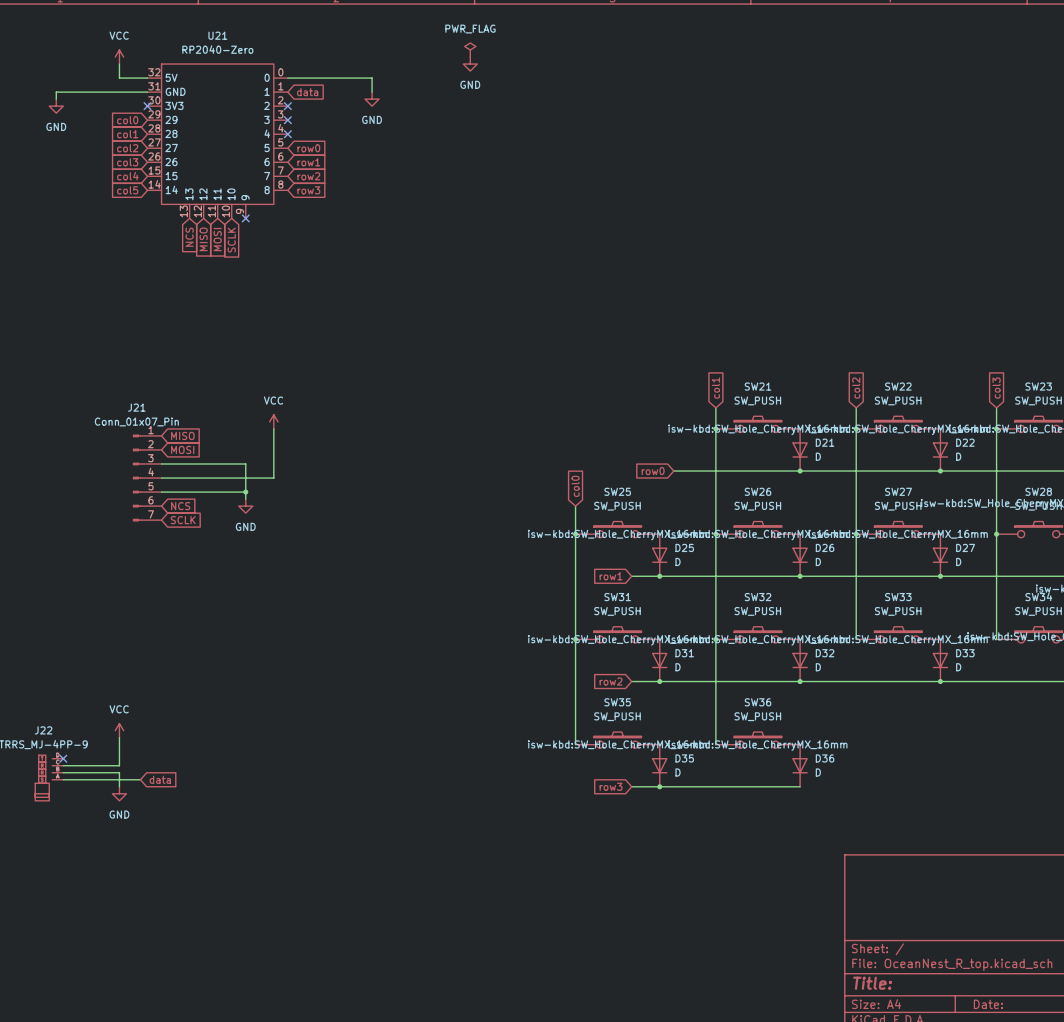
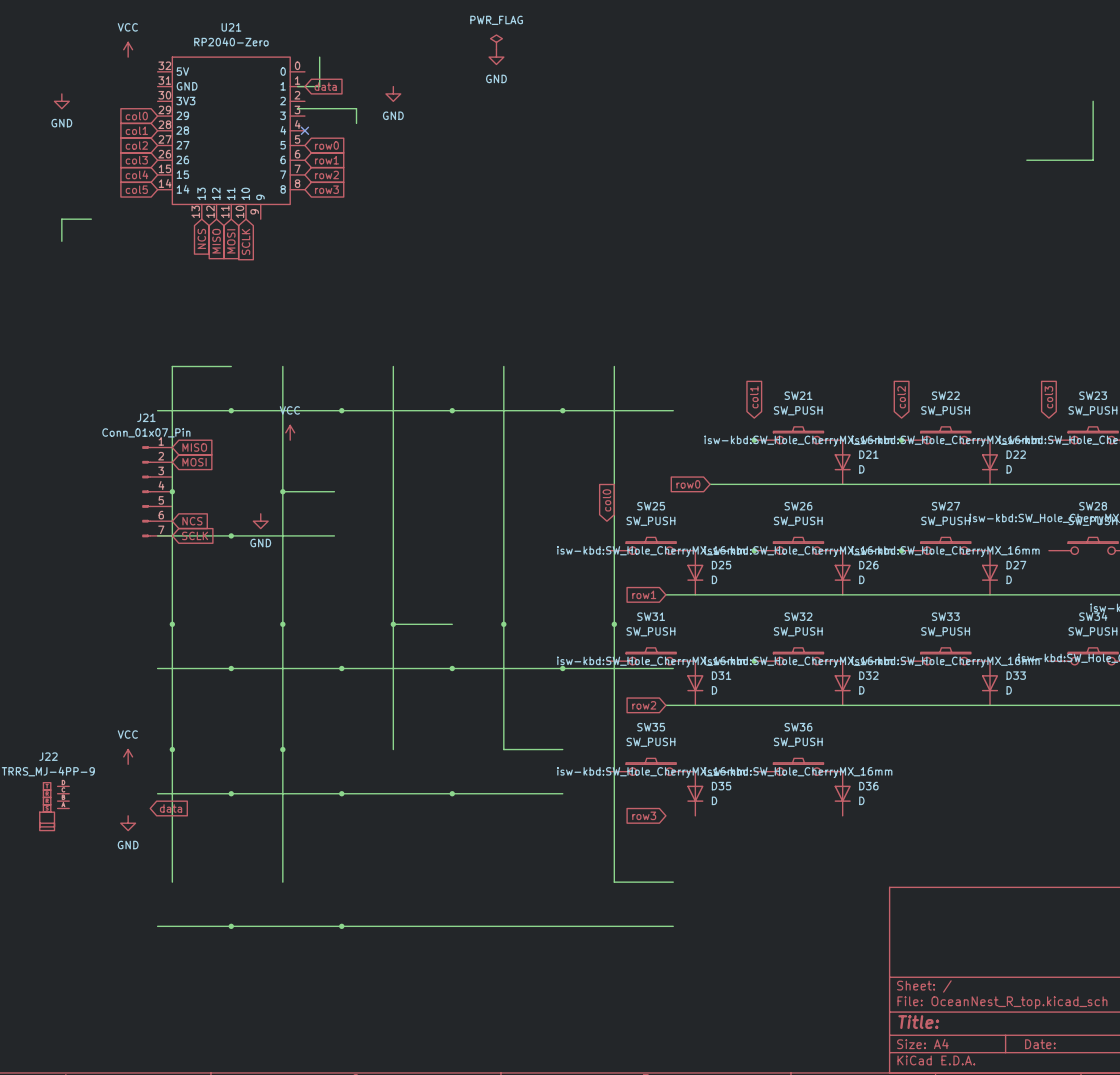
wire: (119, 64) (119, 78) (147, 78) -> none
wire: none -> (319, 57) (319, 86) (297, 86)
wire: (287, 78) (372, 78) (372, 92) -> none
wire: (147, 92) (56, 92) (56, 99) -> none
no-connect mark: (147, 106) -> none
no-connect mark: (287, 106) -> none
wire: none -> (1093, 101) (1093, 160) (1026, 160)
wire: none -> (297, 108) (356, 108) (356, 123)
no-connect mark: (287, 120) -> none
wire: none -> (91, 219) (61, 219) (61, 241)
no-connect mark: (245, 218) -> none
wire: none -> (231, 366) (172, 366) (172, 882)
wire: none -> (282, 366) (282, 882)
wire: none -> (393, 366) (393, 749)
wire: none -> (503, 366) (503, 749) (562, 749)
wire: none -> (614, 366) (614, 882) (673, 882)
wire: none -> (157, 410) (673, 410)
junction: none -> (231, 410)
junction: none -> (341, 410)
junction: none -> (452, 410)
junction: none -> (562, 410)
wire: (715, 407) (715, 744) -> none
wire: (856, 407) (856, 639) -> none
wire: (996, 407) (996, 639) -> none
wire: (273, 428) (273, 478) -> (334, 491) (290, 491)
junction: (996, 428) -> none
wire: (161, 464) (245, 464) (245, 499) -> none
junction: (800, 471) -> none
junction: (940, 471) -> none
wire: (161, 478) (266, 478) -> none
junction: none -> (172, 491)
junction: none -> (282, 491)
wire: (161, 492) (245, 492) -> none
junction: (245, 492) -> none
wire: (575, 506) (575, 744) -> none
wire: none -> (157, 535) (334, 535)
junction: none -> (231, 535)
junction: (575, 534) -> none
junction: (996, 534) -> none
junction: (659, 576) -> none
junction: (800, 576) -> none
junction: (940, 576) -> none
junction: none -> (172, 624)
junction: none -> (282, 624)
wire: none -> (393, 624) (452, 624)
junction: none -> (393, 624)
junction: none -> (503, 624)
junction: none -> (614, 624)
junction: (575, 639) -> none
wire: none -> (157, 668) (673, 668)
junction: none -> (231, 668)
junction: none -> (341, 668)
junction: none -> (452, 668)
junction: none -> (562, 668)
junction: (659, 681) -> none
junction: (800, 681) -> none
junction: (940, 681) -> none
junction: none -> (172, 749)
junction: none -> (282, 749)
wire: (119, 737) (119, 765) (63, 765) -> none
no-connect mark: (63, 758) -> none
wire: none -> (157, 793) (562, 793)
junction: none -> (231, 793)
junction: none -> (341, 793)
junction: none -> (452, 793)
wire: (63, 772) (119, 772) (119, 786) -> none
wire: (63, 779) (140, 779) -> none
wire: (631, 786) (800, 786) -> none
junction: (659, 786) -> none
wire: none -> (157, 926) (673, 926)
junction: none -> (231, 926)
junction: none -> (341, 926)

